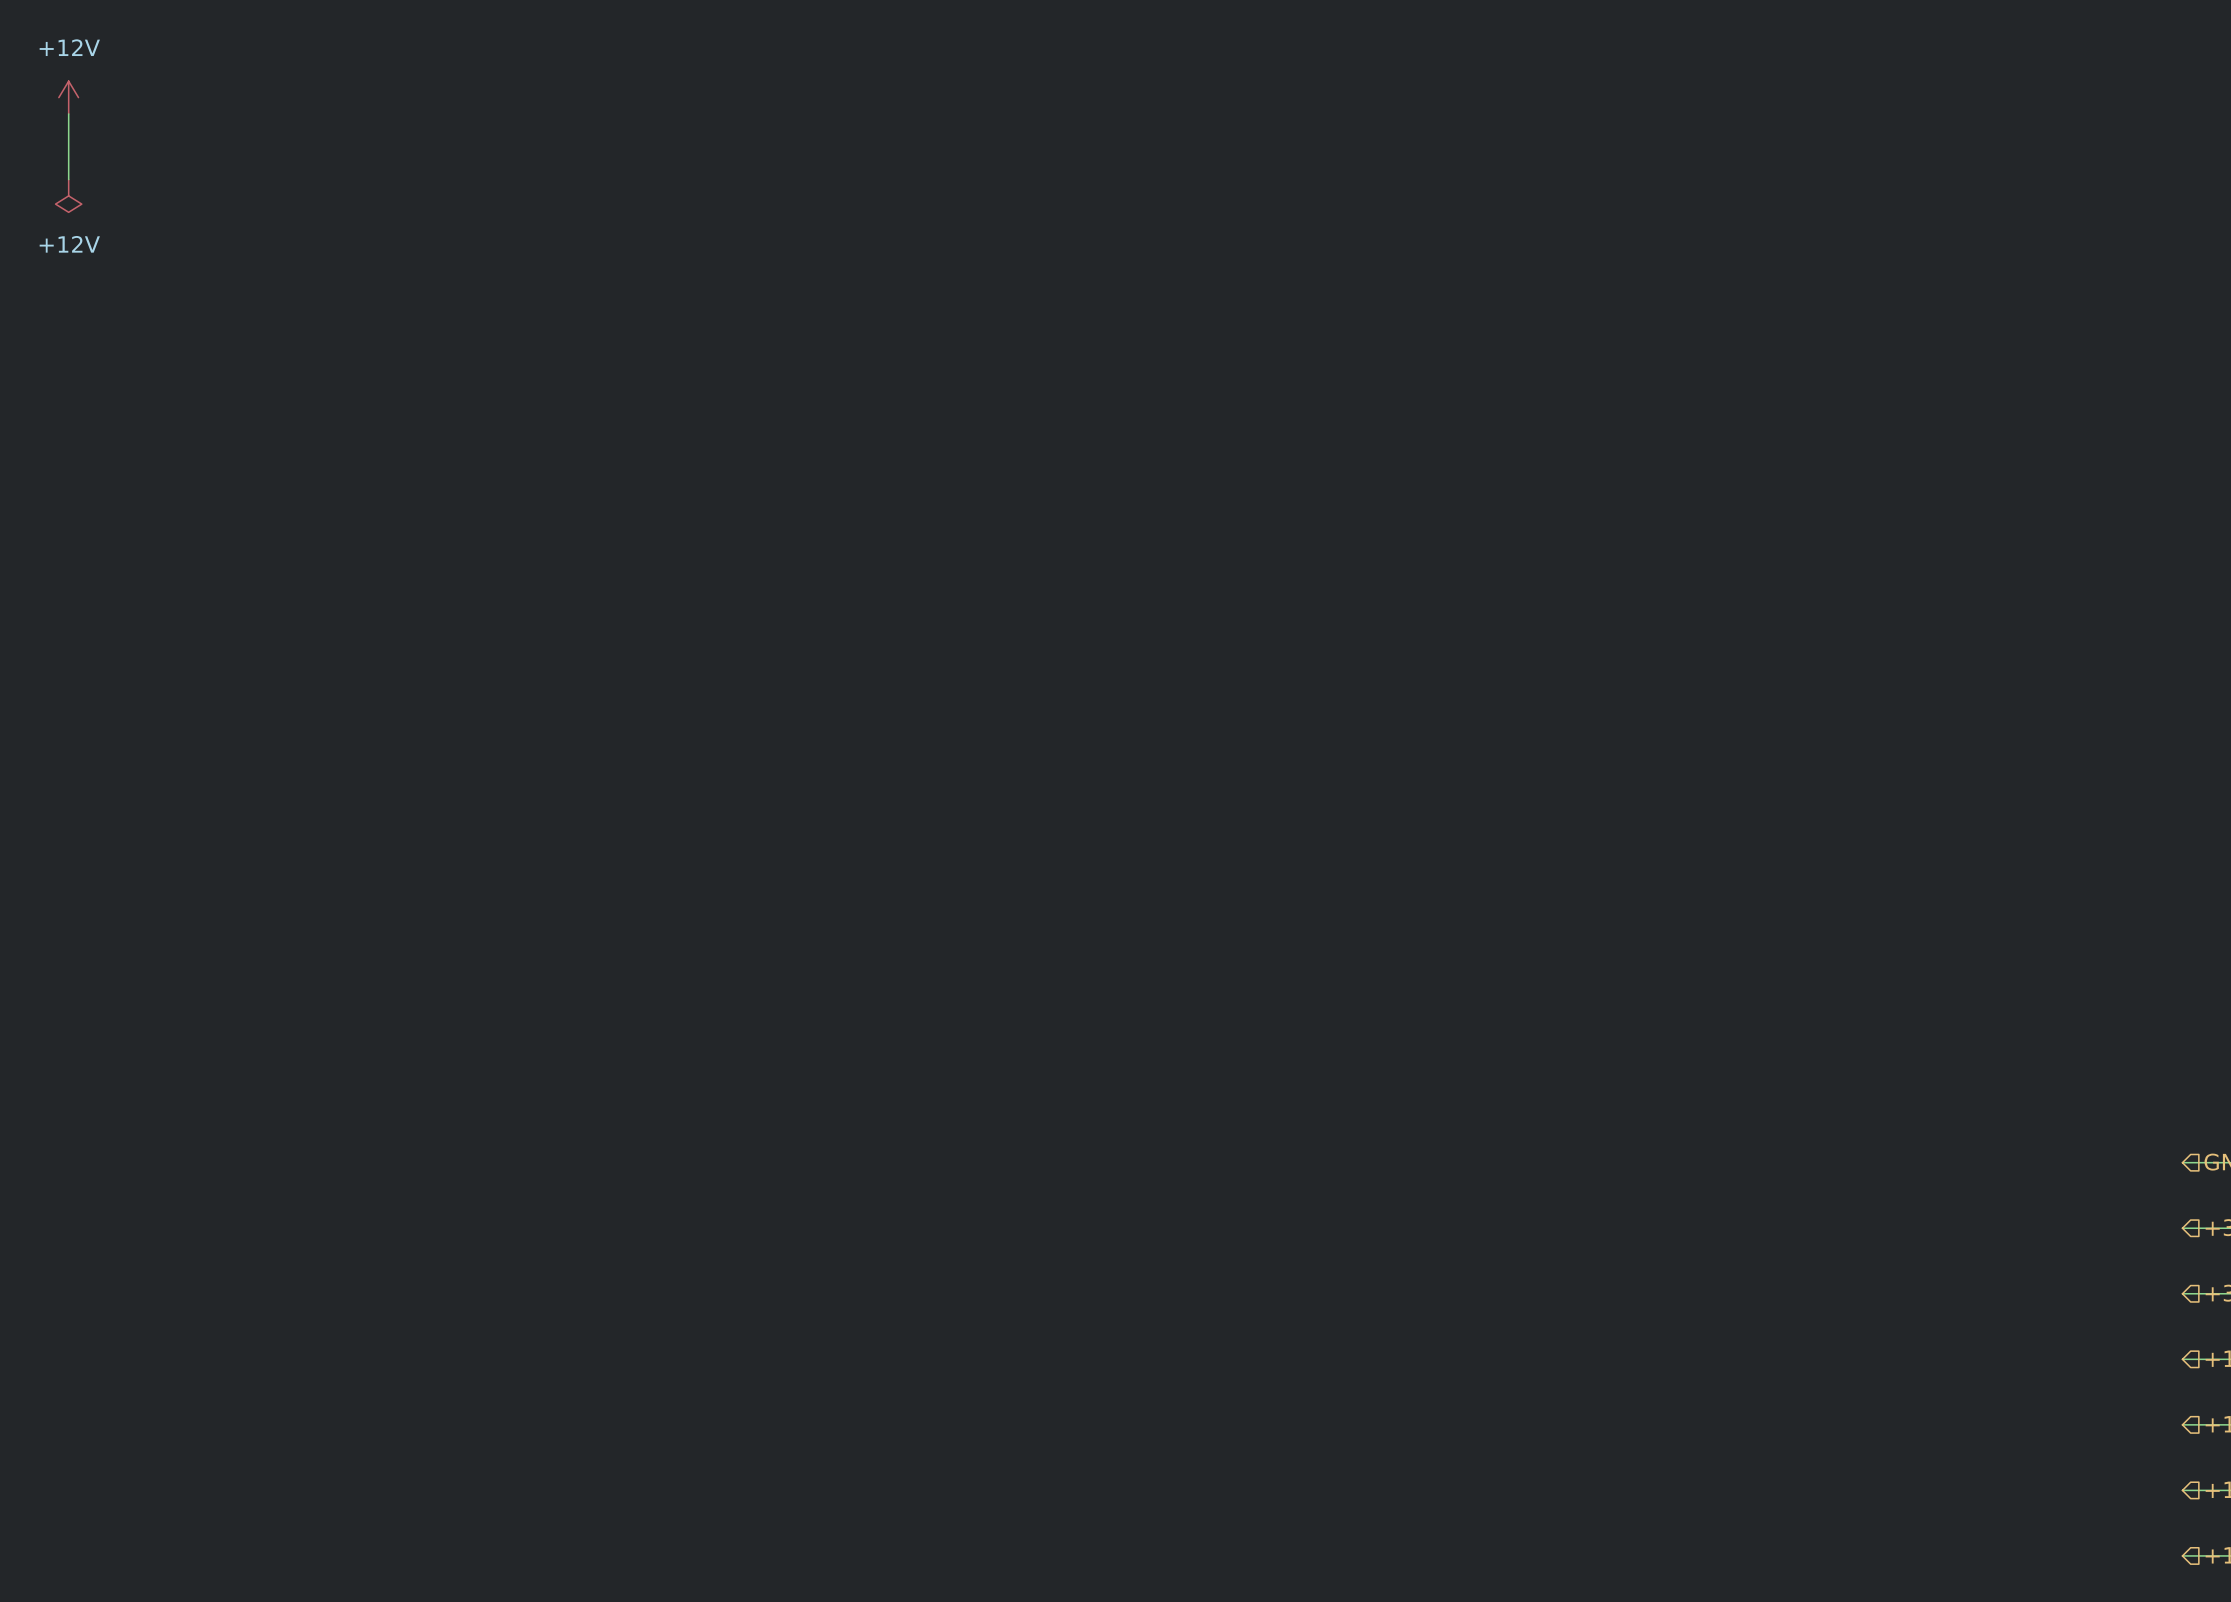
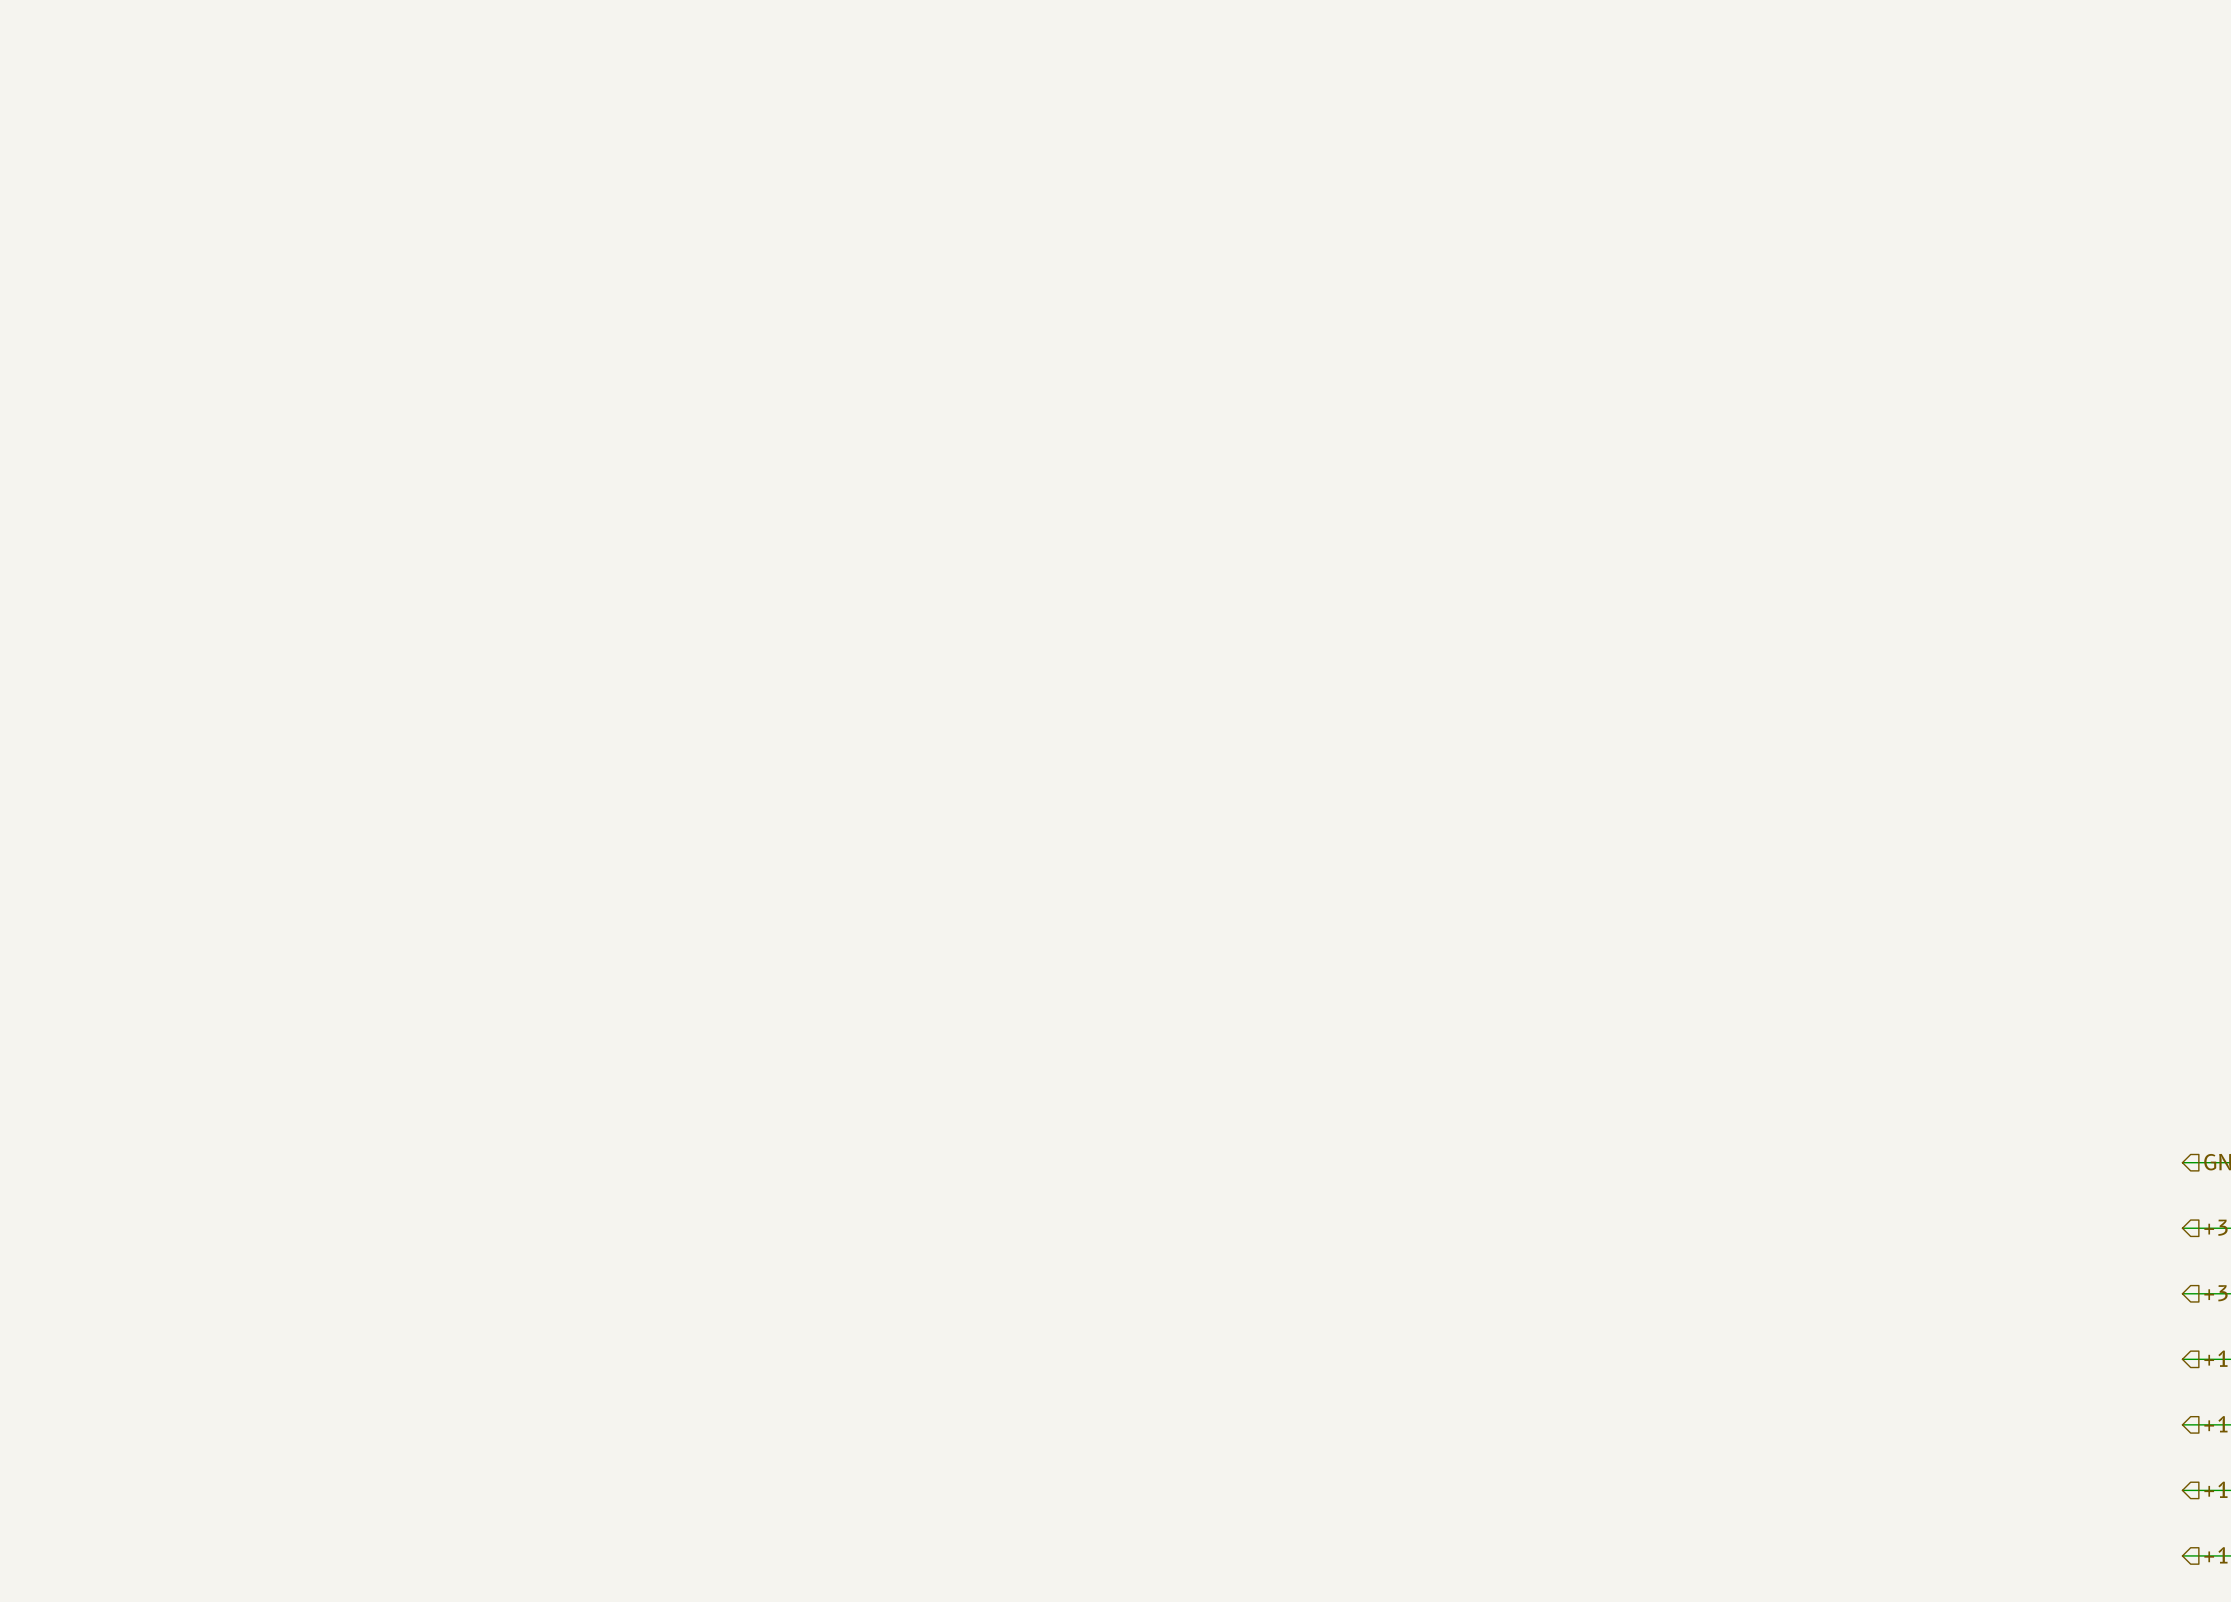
power symbol: +12V (68, 97) -> none
wire: (68, 113) (68, 179) -> none
power symbol: +12V (68, 195) -> none

